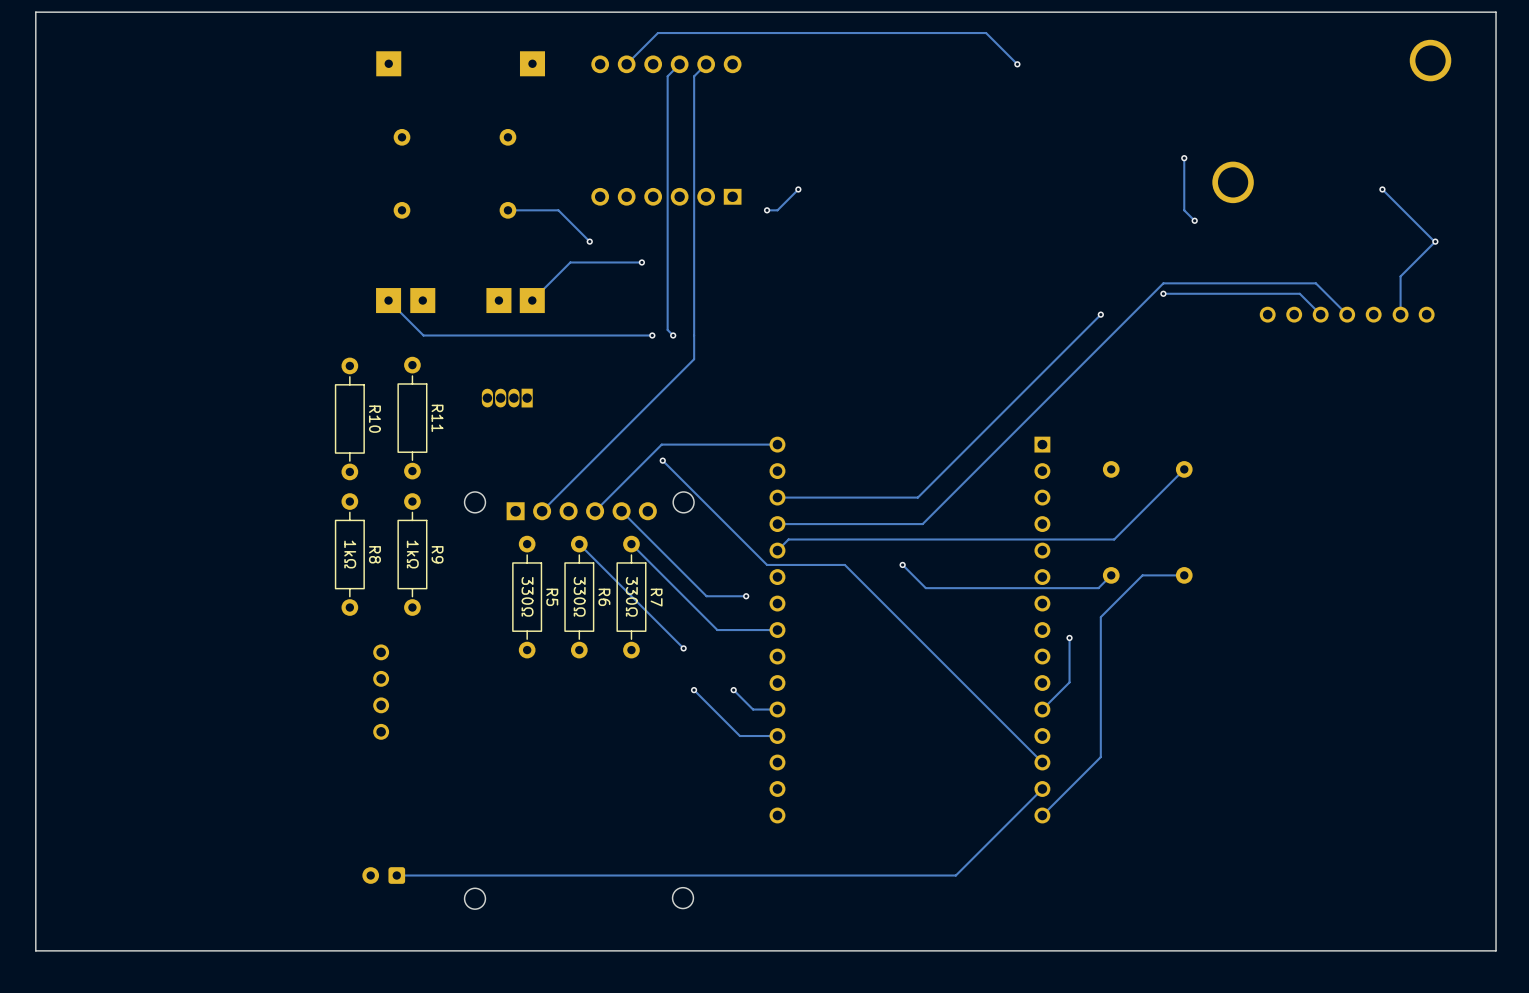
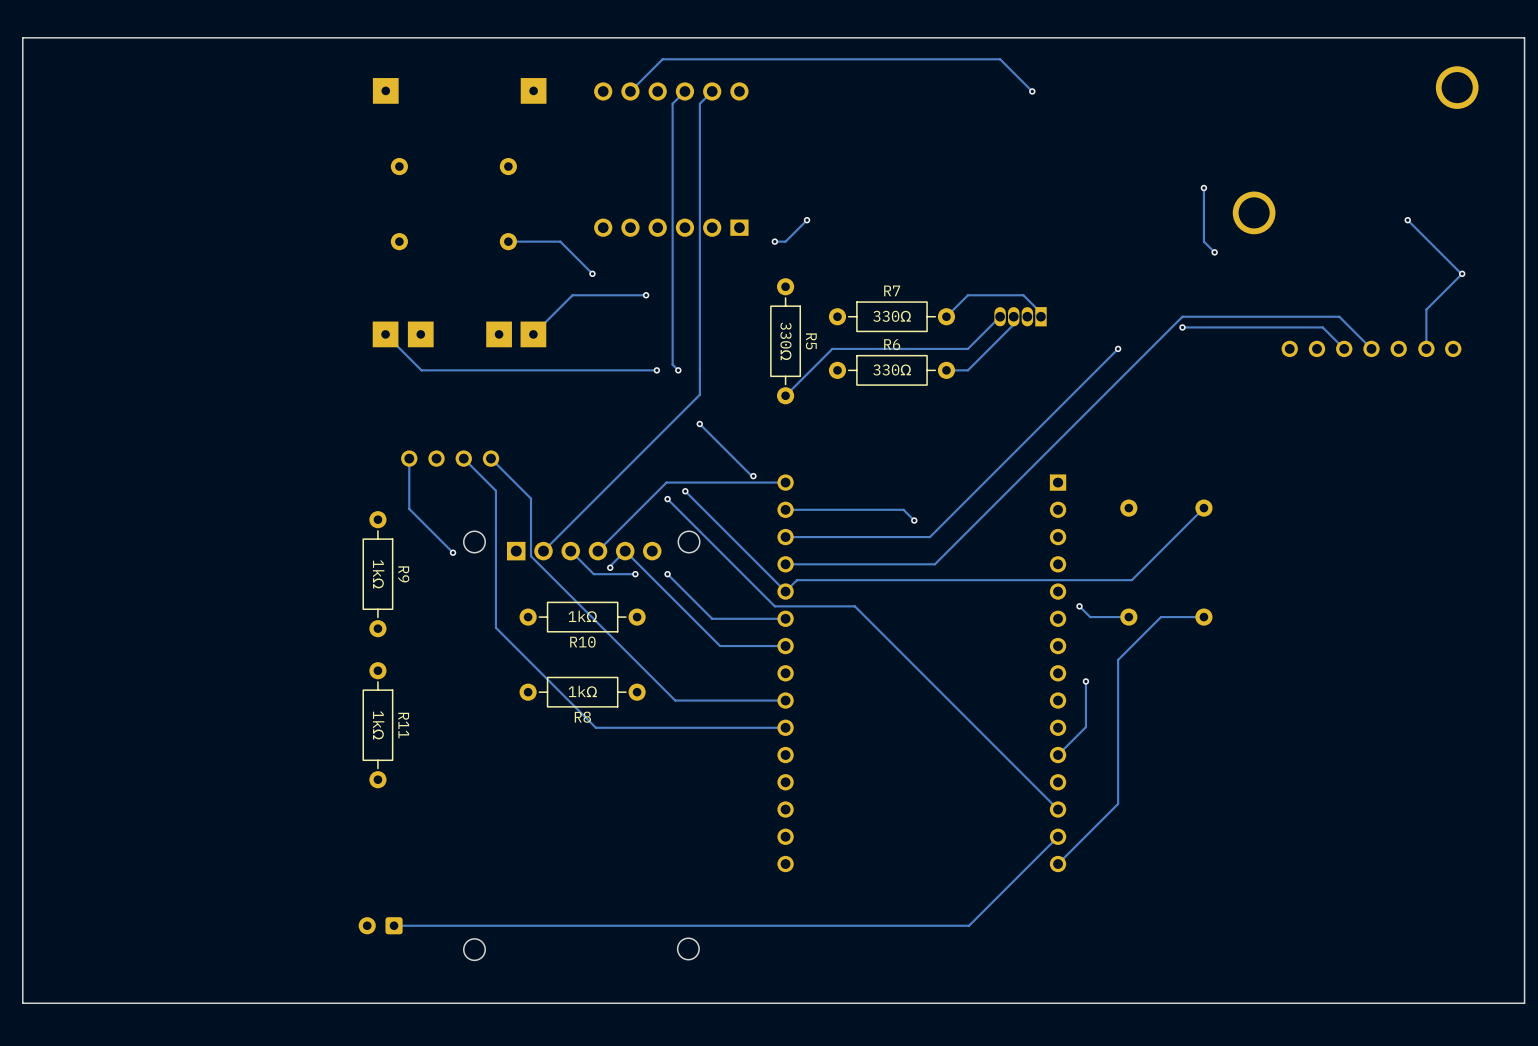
track: none -> (1000, 316) (967, 348) (832, 348) (785, 395)
track: none -> (1013, 316) (1013, 324) (967, 370) (946, 370)
part: none -> (1020, 316)
track: none -> (1040, 316) (1040, 312) (1023, 295) (967, 295) (946, 316)
R10 footprint: [334, 357, 365, 481] -> [519, 601, 646, 633]
track: none -> (699, 424) (753, 476)
via: none -> (699, 424)
part: (507, 398) -> none
R11 position: (412, 418) -> (377, 725)
R10 name position: R10 (374, 419) -> R10 (582, 642)
track: none -> (409, 458) (409, 508) (453, 552)
part: none -> (450, 458)
track: none -> (463, 458) (495, 490) (495, 627) (595, 727) (785, 727)
track: none -> (491, 458) (531, 498) (531, 556) (675, 700) (785, 700)
via: none -> (753, 476)
track: none -> (685, 491) (785, 591)
via: none -> (685, 491)
track: none -> (785, 509) (903, 509) (914, 520)
via: none -> (914, 520)
track: none -> (570, 551) (593, 574) (635, 574)
track: none -> (625, 551) (610, 567)
via: none -> (453, 552)
via: none -> (610, 567)
via: none -> (635, 574)
track: none -> (667, 574) (712, 618) (785, 618)
via: none -> (667, 574)
track: (579, 544) (683, 648) -> none
track: (631, 544) (717, 630) (777, 630) -> none
R8 rotation: 0° (349, 554) -> 90° clockwise (582, 692)
R8 position: (349, 554) -> (582, 692)
R9 position: (412, 554) -> (377, 574)
track: (902, 564) (925, 588) (1098, 588) (1111, 575) -> (1079, 606) (1090, 617) (1128, 617)
via: (902, 564) -> none
via: none -> (1079, 606)
track: (746, 596) (706, 596) -> (785, 646) (720, 646) (712, 638)
via: (746, 596) -> none
R5 position: (527, 597) -> (785, 341)
R6 rotation: 0° (579, 597) -> 90° clockwise (891, 370)
R6 position: (579, 597) -> (891, 370)
R6 name position: R6 (604, 597) -> R6 (892, 344)
R7 rotation: 0° (631, 597) -> 90° clockwise (891, 316)
R7 position: (631, 597) -> (891, 316)
R7 name position: R7 (656, 597) -> R7 (892, 290)
via: (683, 648) -> none
R11 text: none -> 1kΩ (378, 725)
track: (694, 690) (739, 736) (777, 736) -> none
via: (694, 690) -> none
track: (733, 690) (753, 709) (777, 709) -> none
via: (733, 690) -> none
part: (381, 692) -> none

